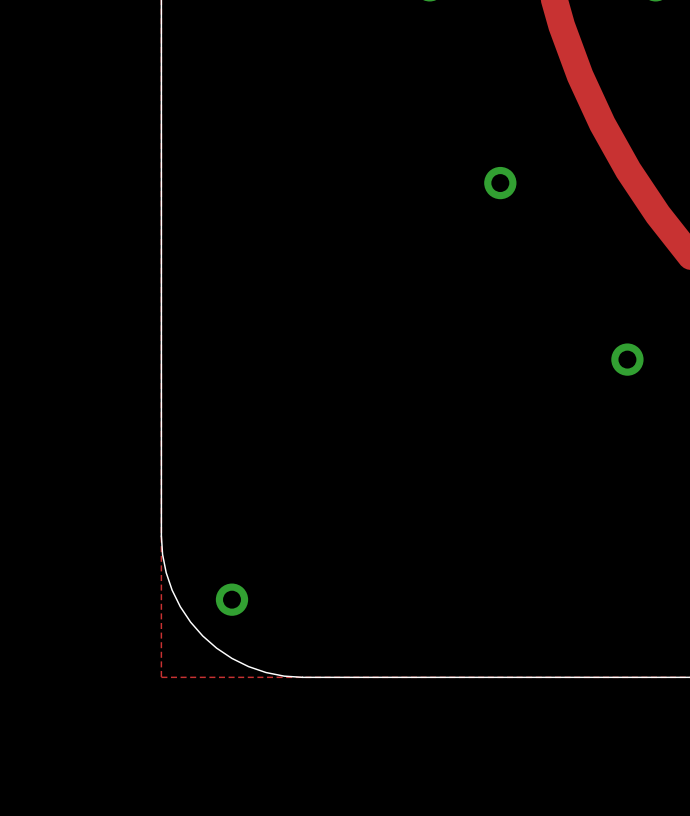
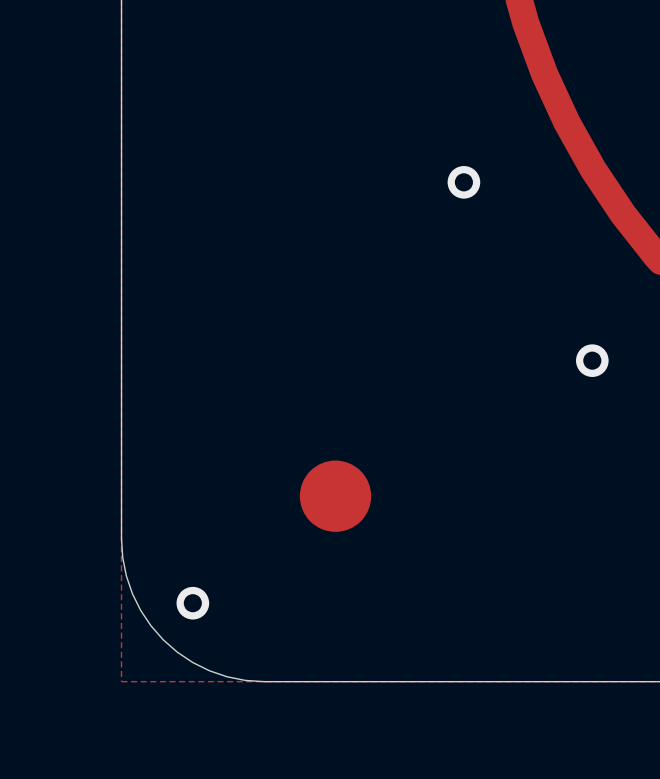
part: none -> (335, 496)

